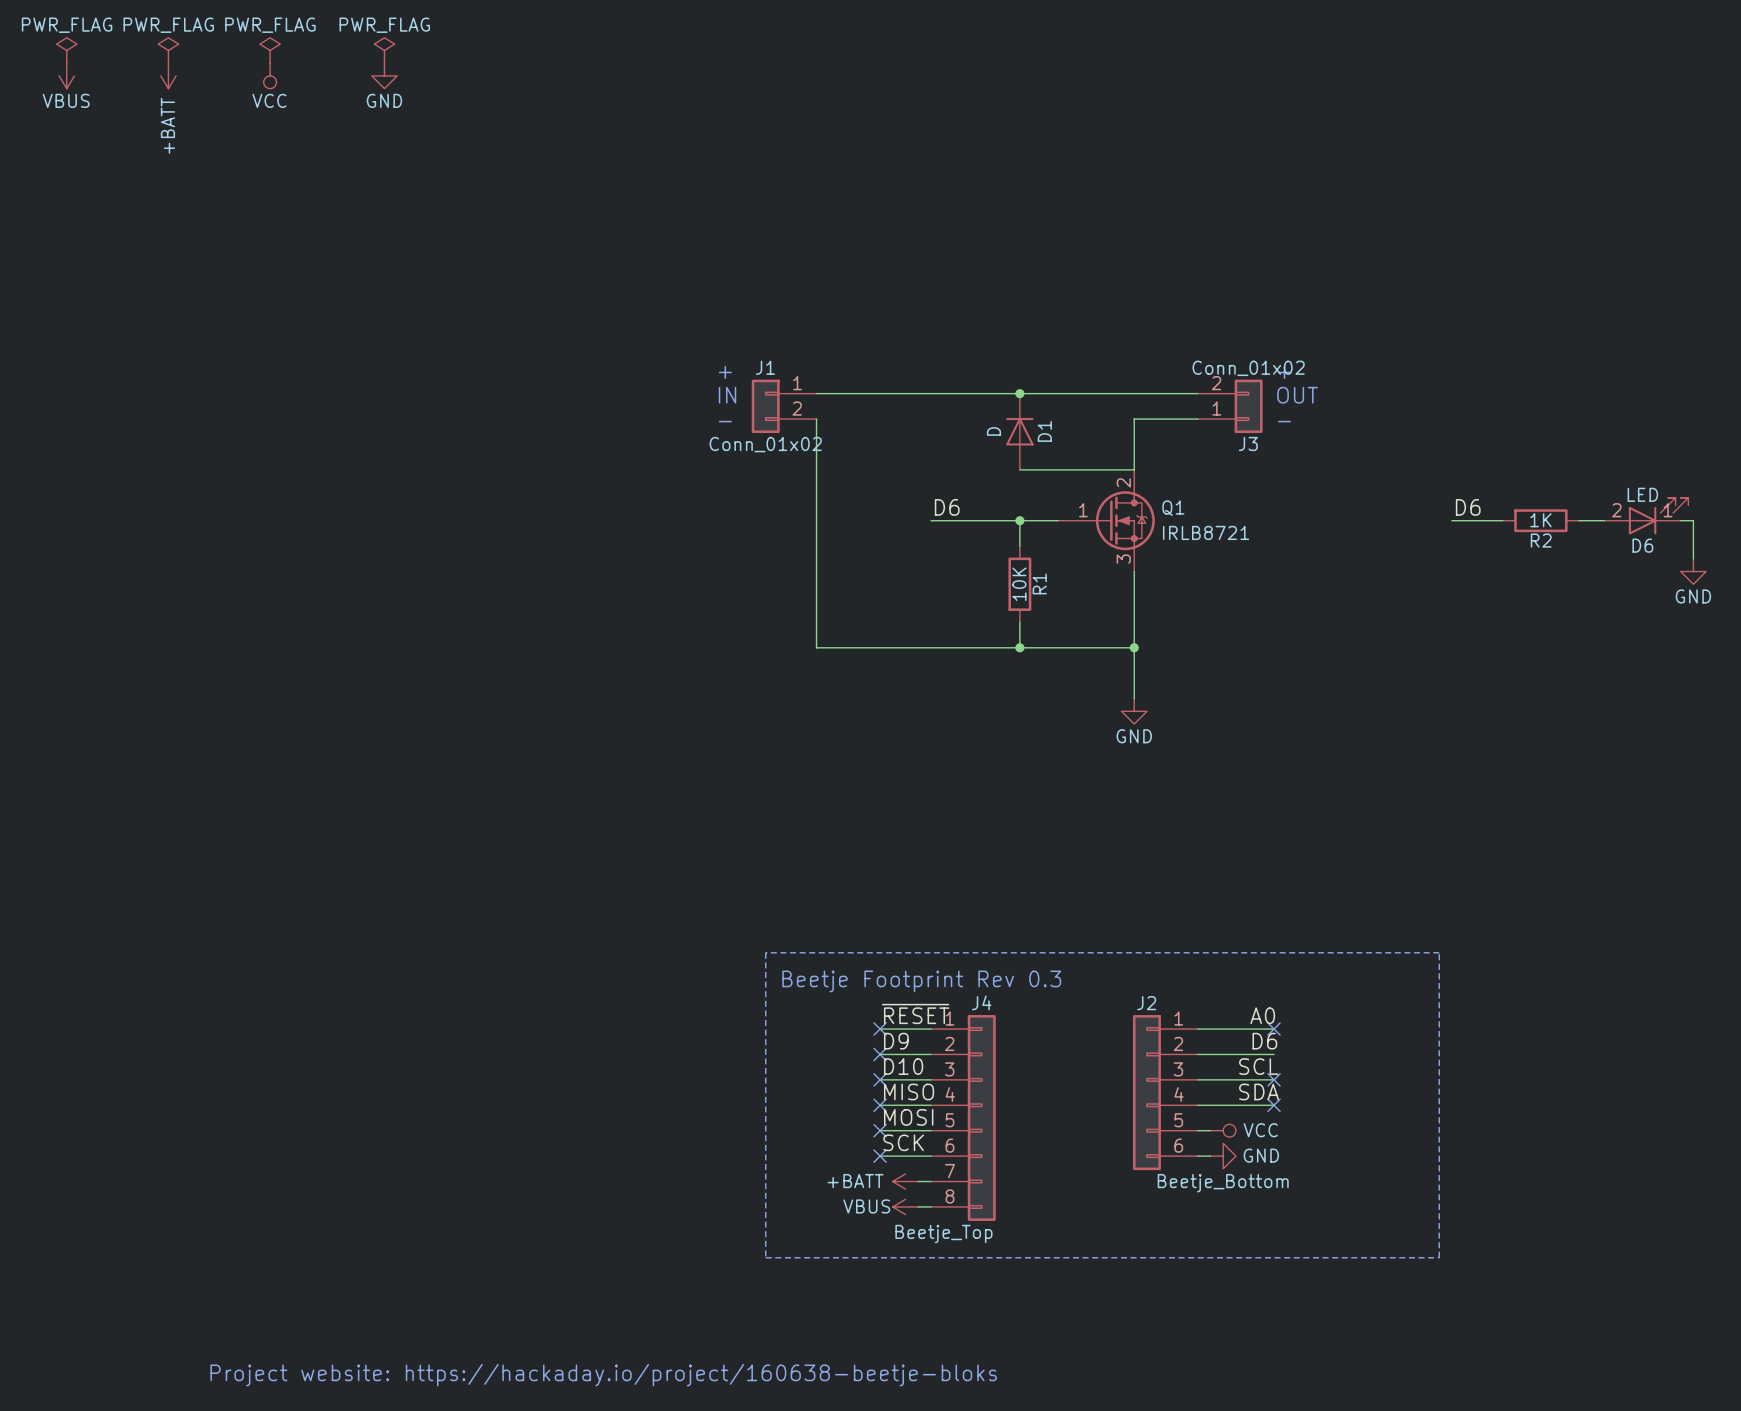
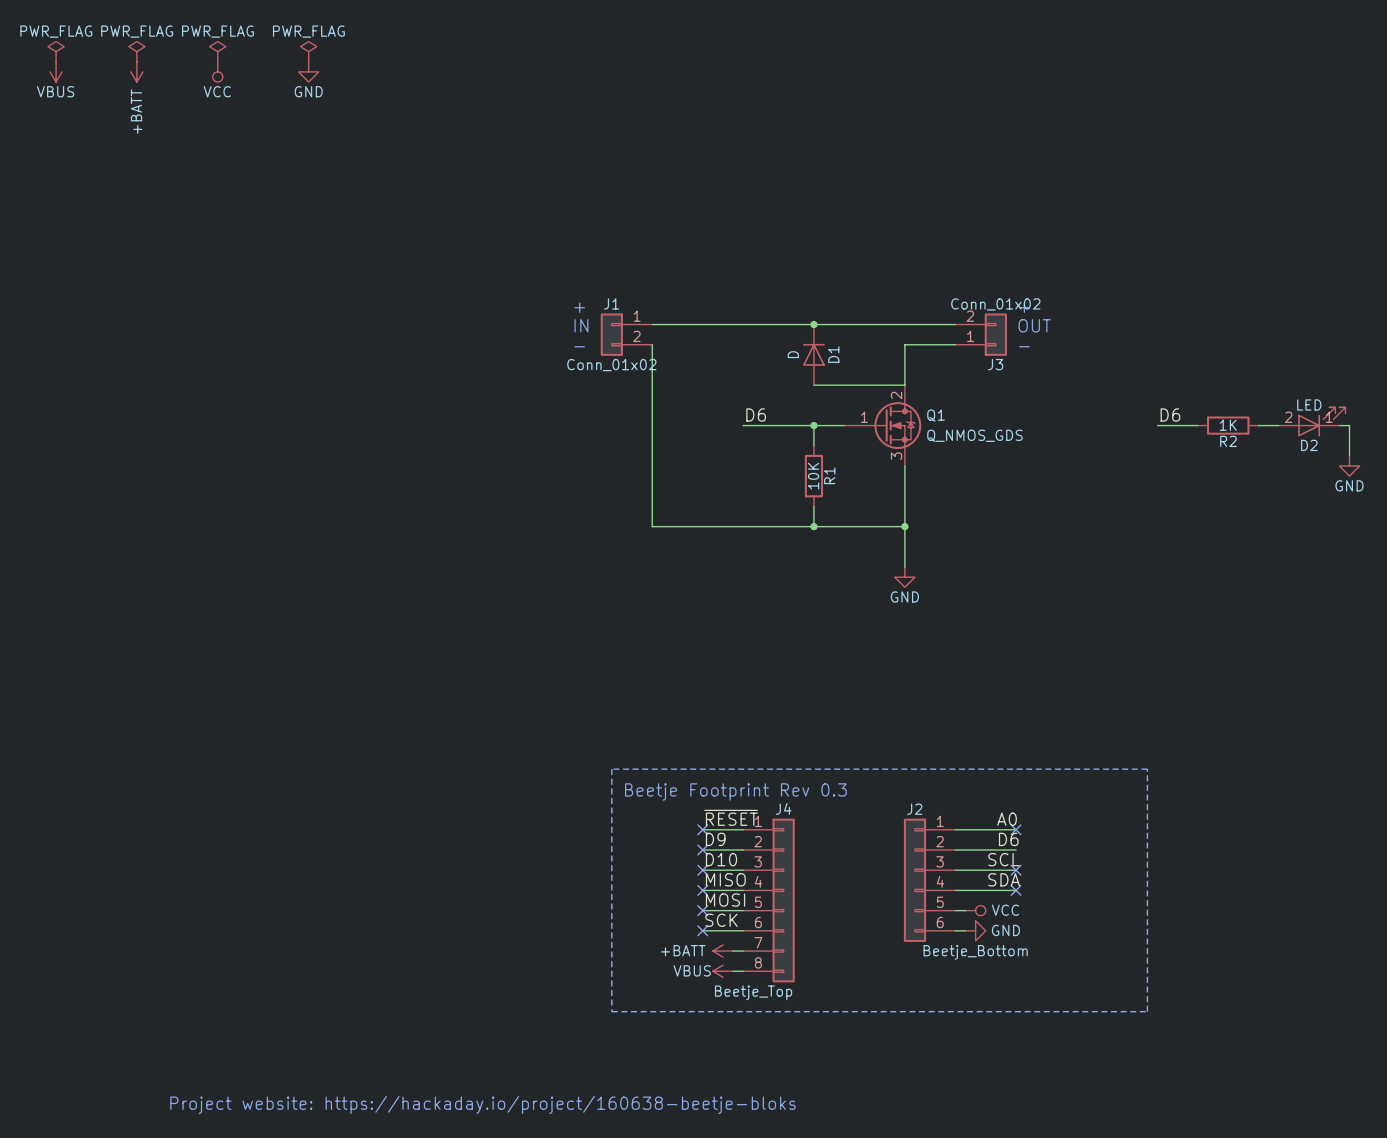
Q1 value: IRLB8721 (1206, 532) -> Q_NMOS_GDS (974, 435)
D6 name: D6 (1642, 545) -> D2 (1309, 445)

